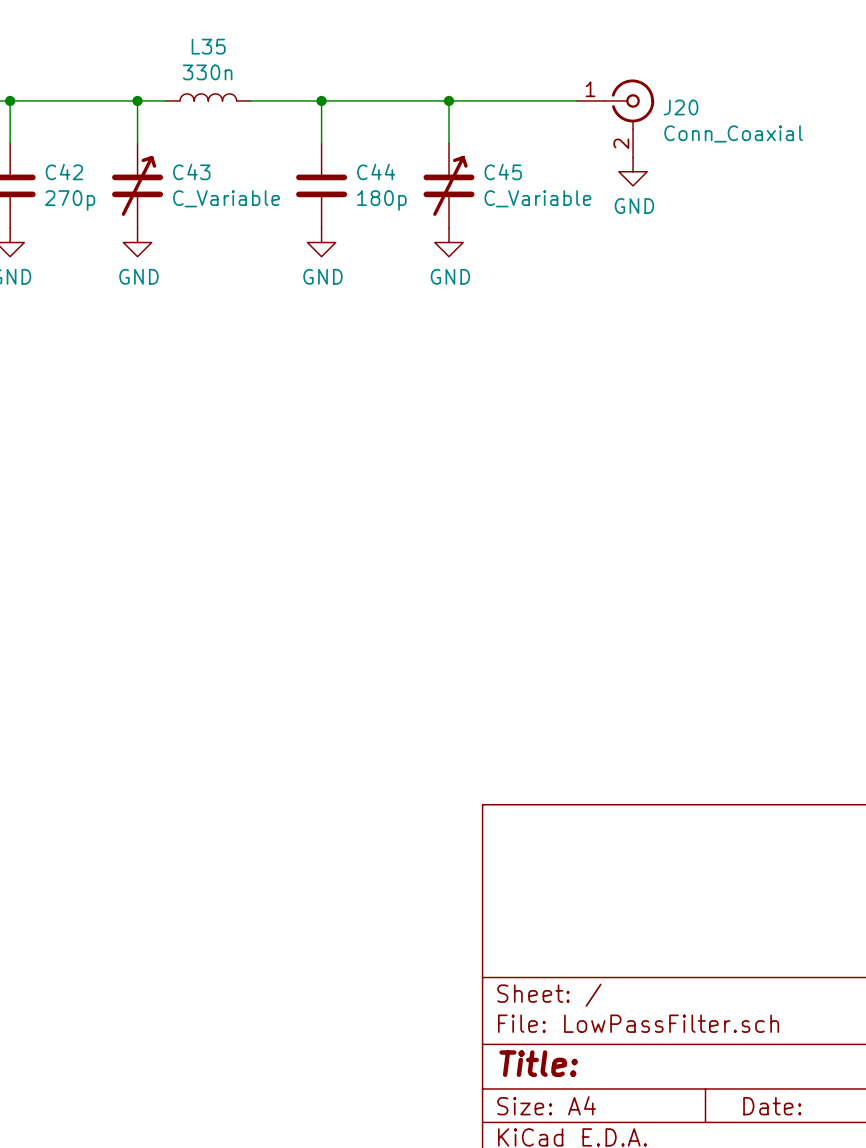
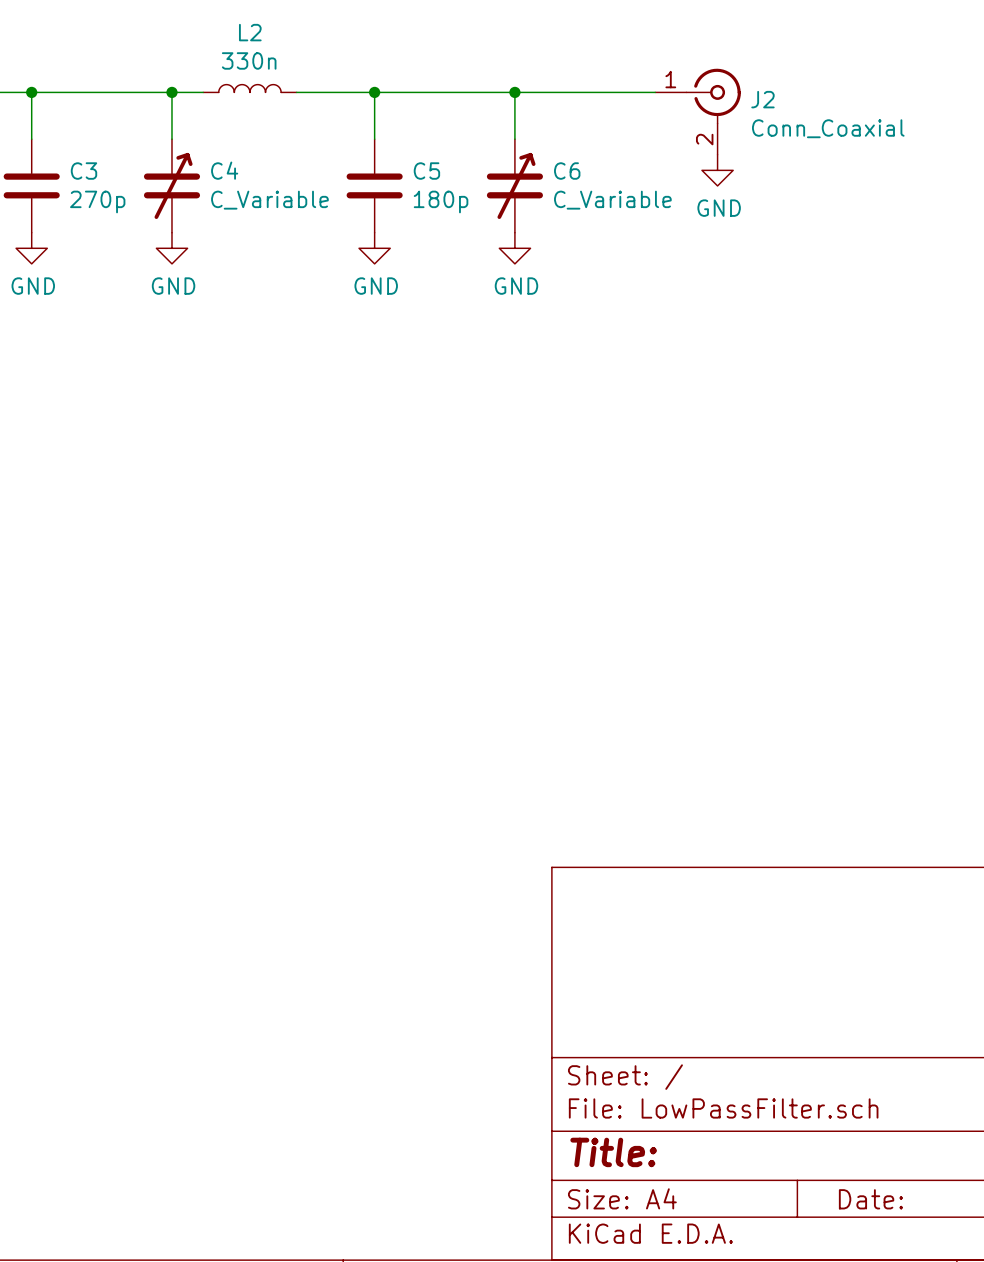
L35 name: L35 (208, 46) -> L2 (250, 32)
J20 name: J20 (681, 107) -> J2 (762, 99)
C42 name: C42 (64, 172) -> C3 (83, 171)
C43 name: C43 (191, 172) -> C4 (224, 170)
C44 name: C44 (376, 172) -> C5 (426, 171)
C45 name: C45 (503, 172) -> C6 (567, 171)

